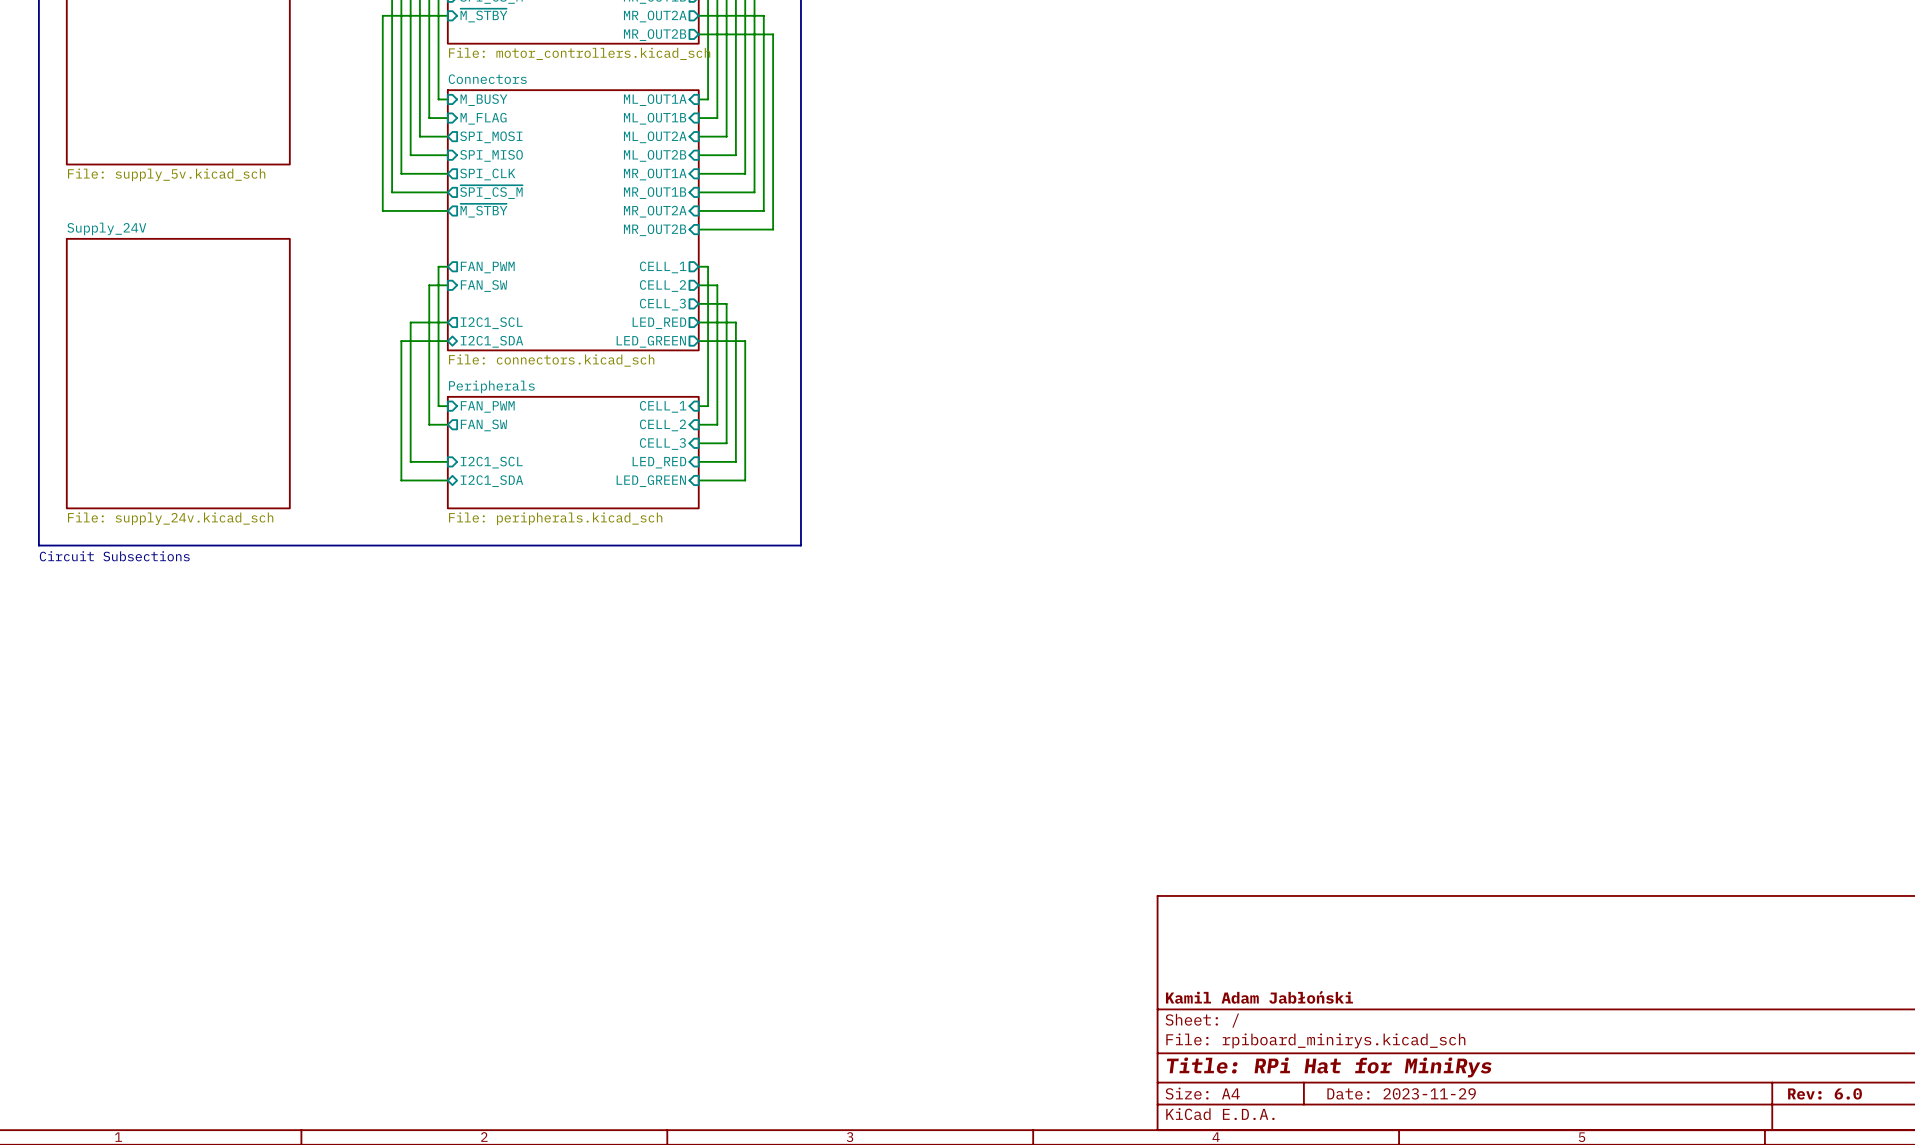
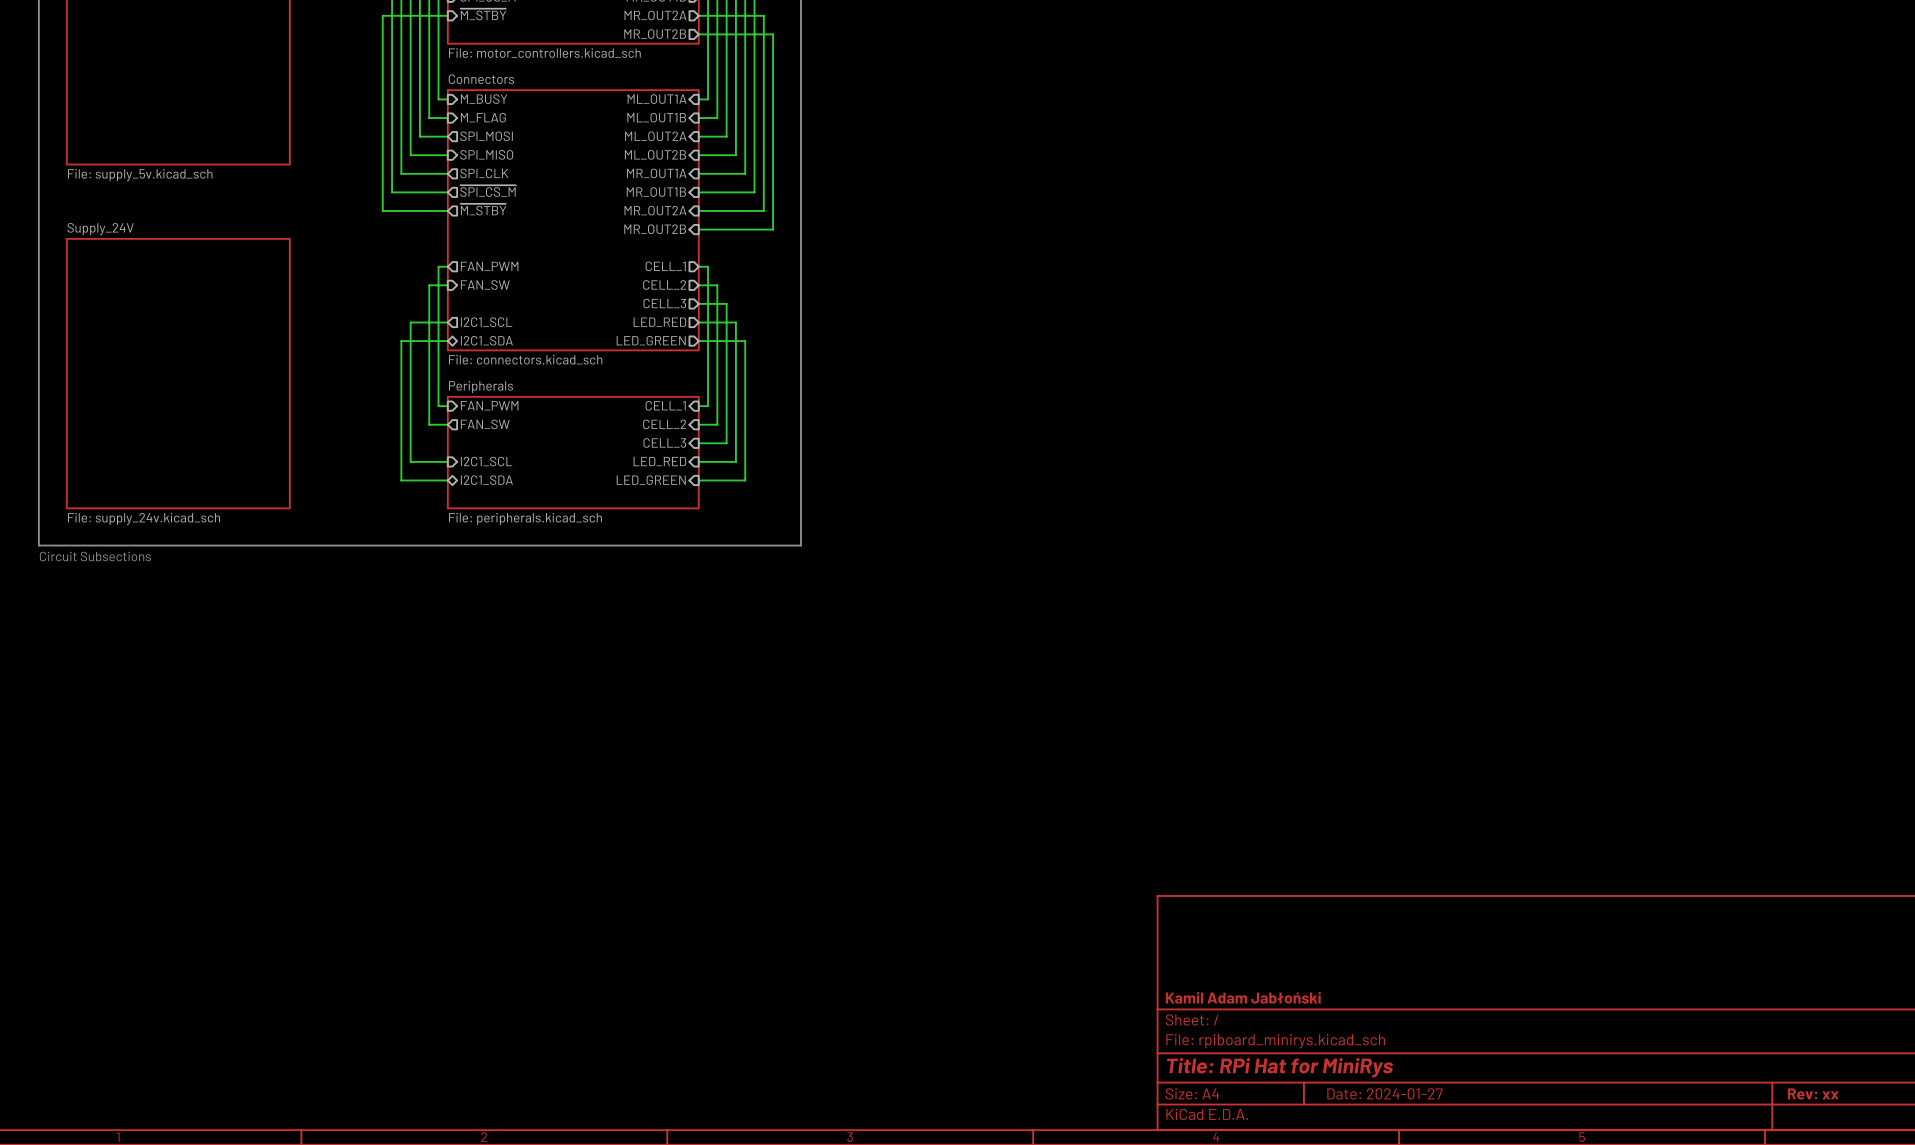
title block: Date: 2023-11-29 (1401, 1093) -> Date: 2024-01-27 (1384, 1093)
title block: Rev: 6.0 (1825, 1093) -> Rev: xx (1813, 1093)

